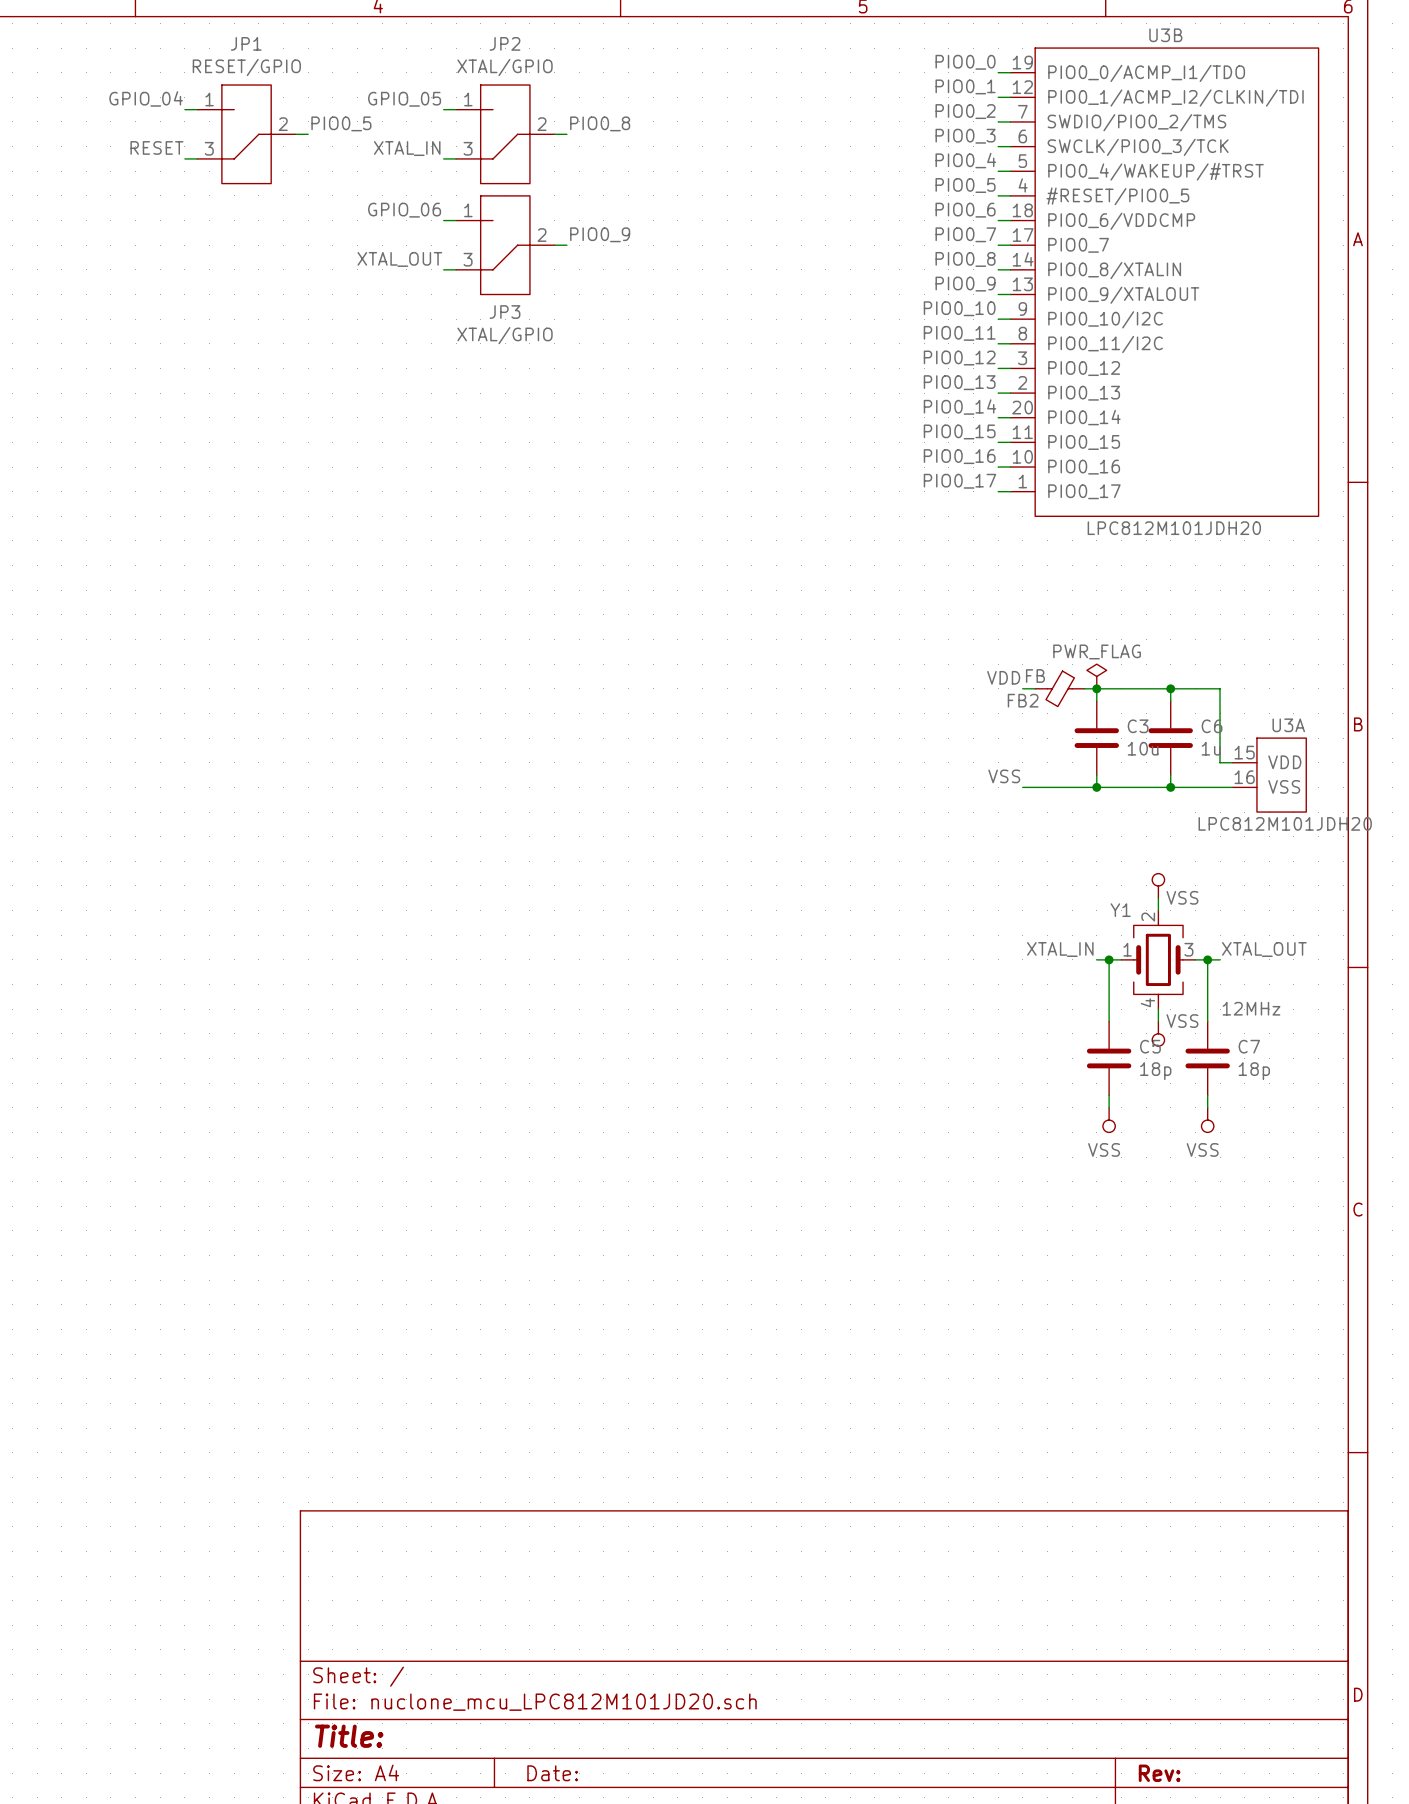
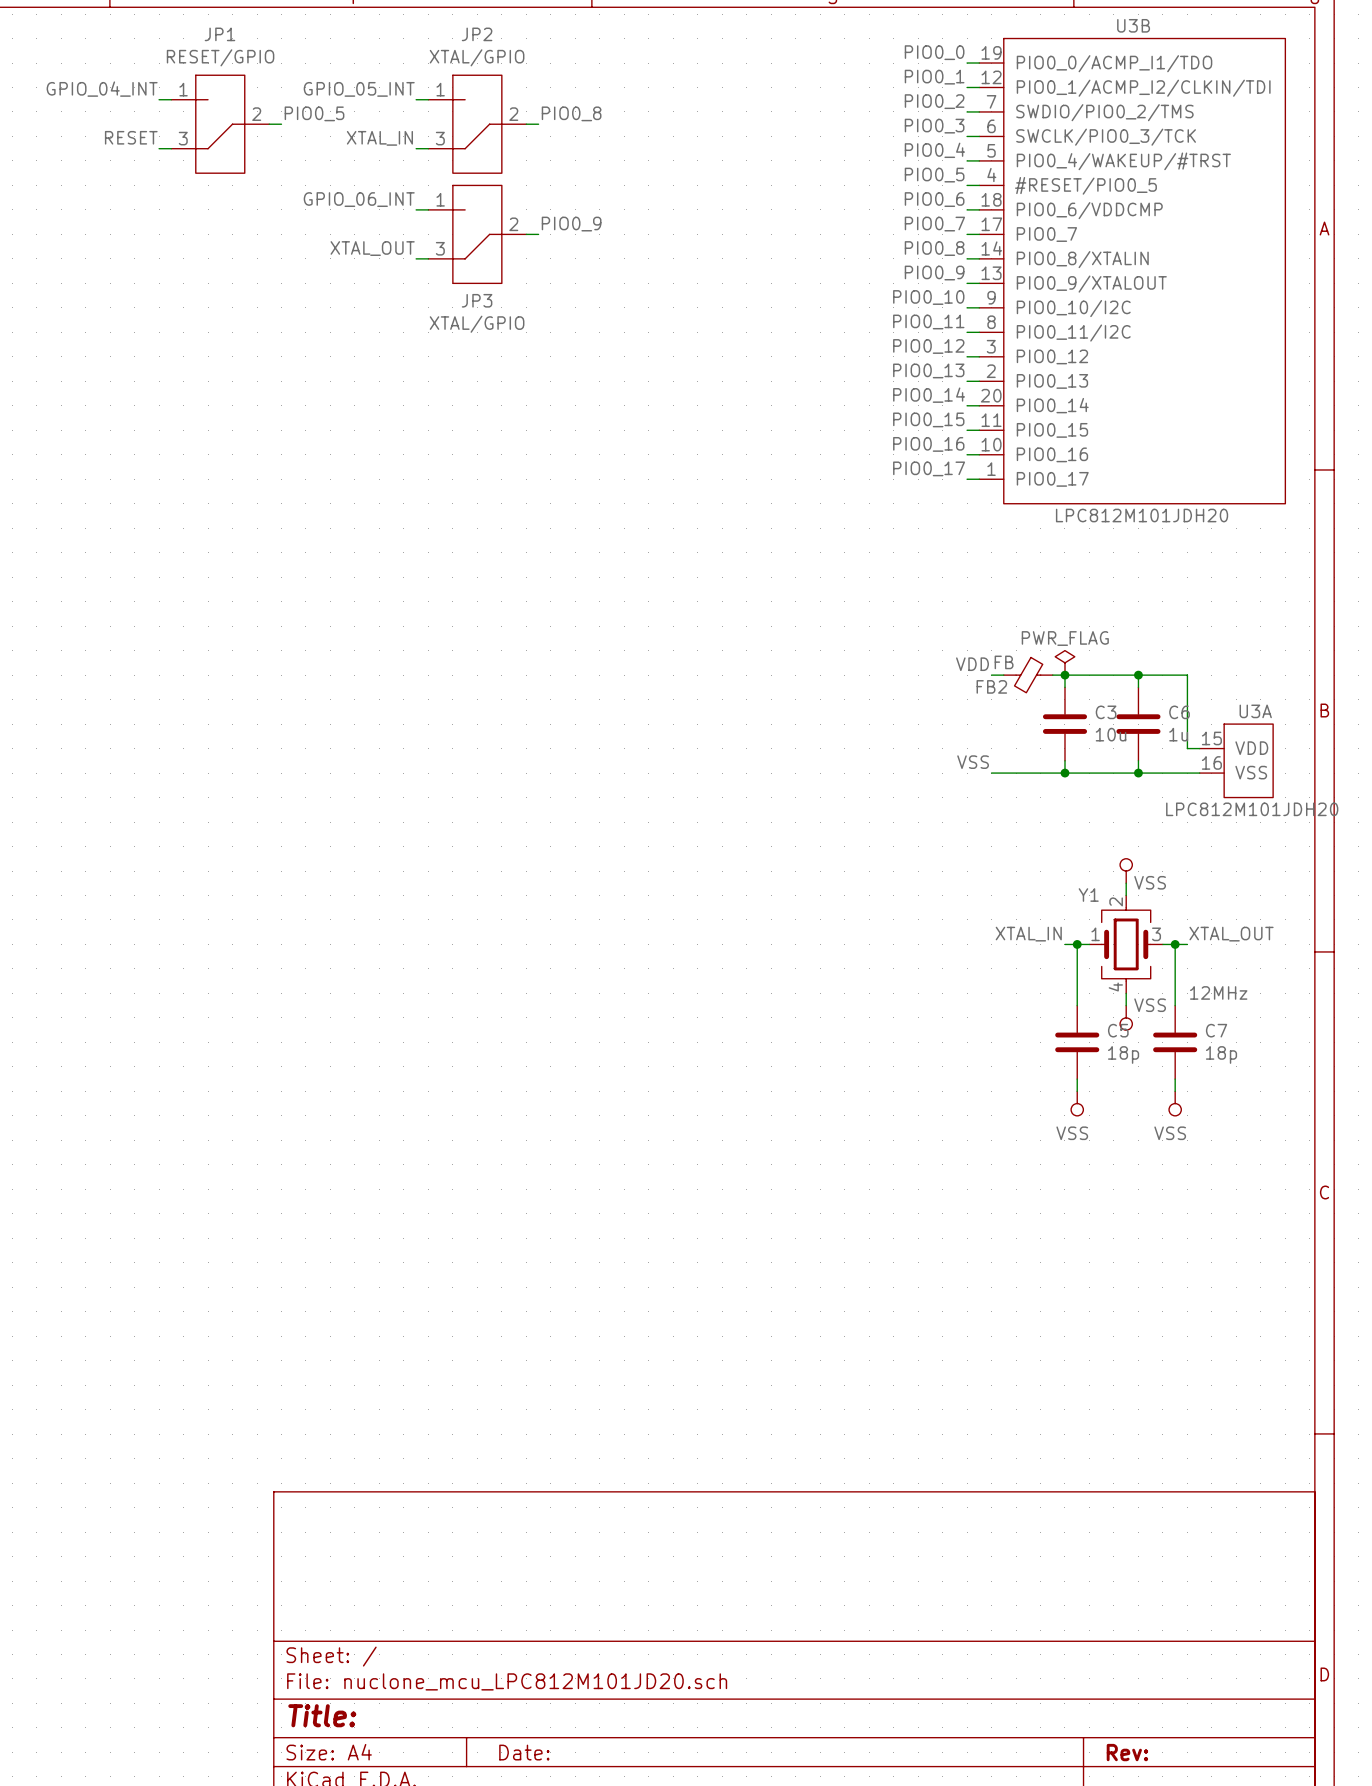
label: GPIO_04 (146, 98) -> GPIO_04_INT (102, 89)
label: GPIO_05 (404, 99) -> GPIO_05_INT (359, 89)
label: GPIO_06 (404, 210) -> GPIO_06_INT (359, 199)

